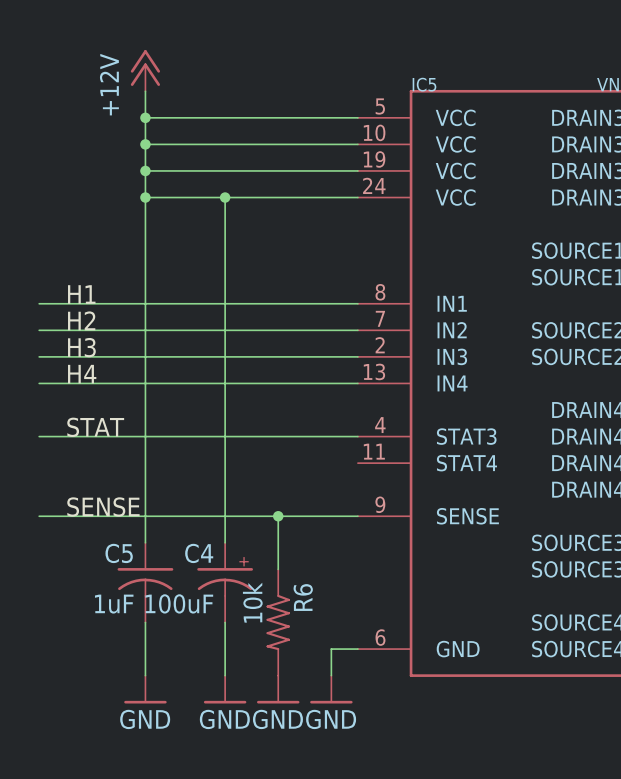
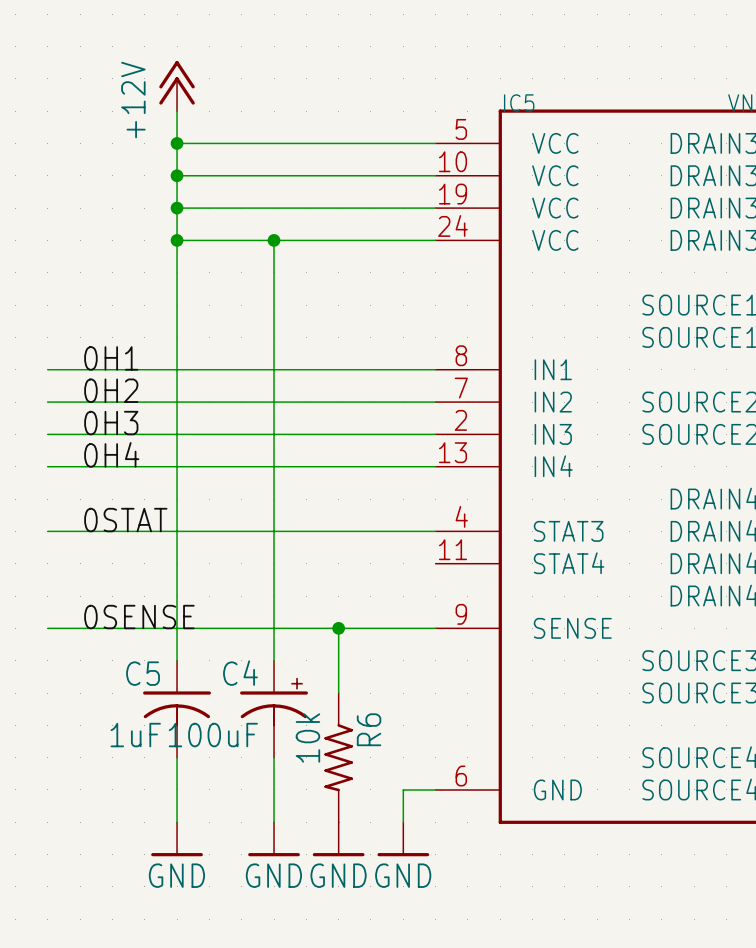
label: H1 (81, 294) -> 0H1 (111, 358)
label: H2 (81, 320) -> 0H2 (111, 390)
label: H3 (81, 347) -> 0H3 (111, 423)
label: H4 (82, 374) -> 0H4 (111, 454)
label: STAT (95, 427) -> 0STAT (125, 520)
label: SENSE (103, 506) -> 0SENSE (139, 617)

